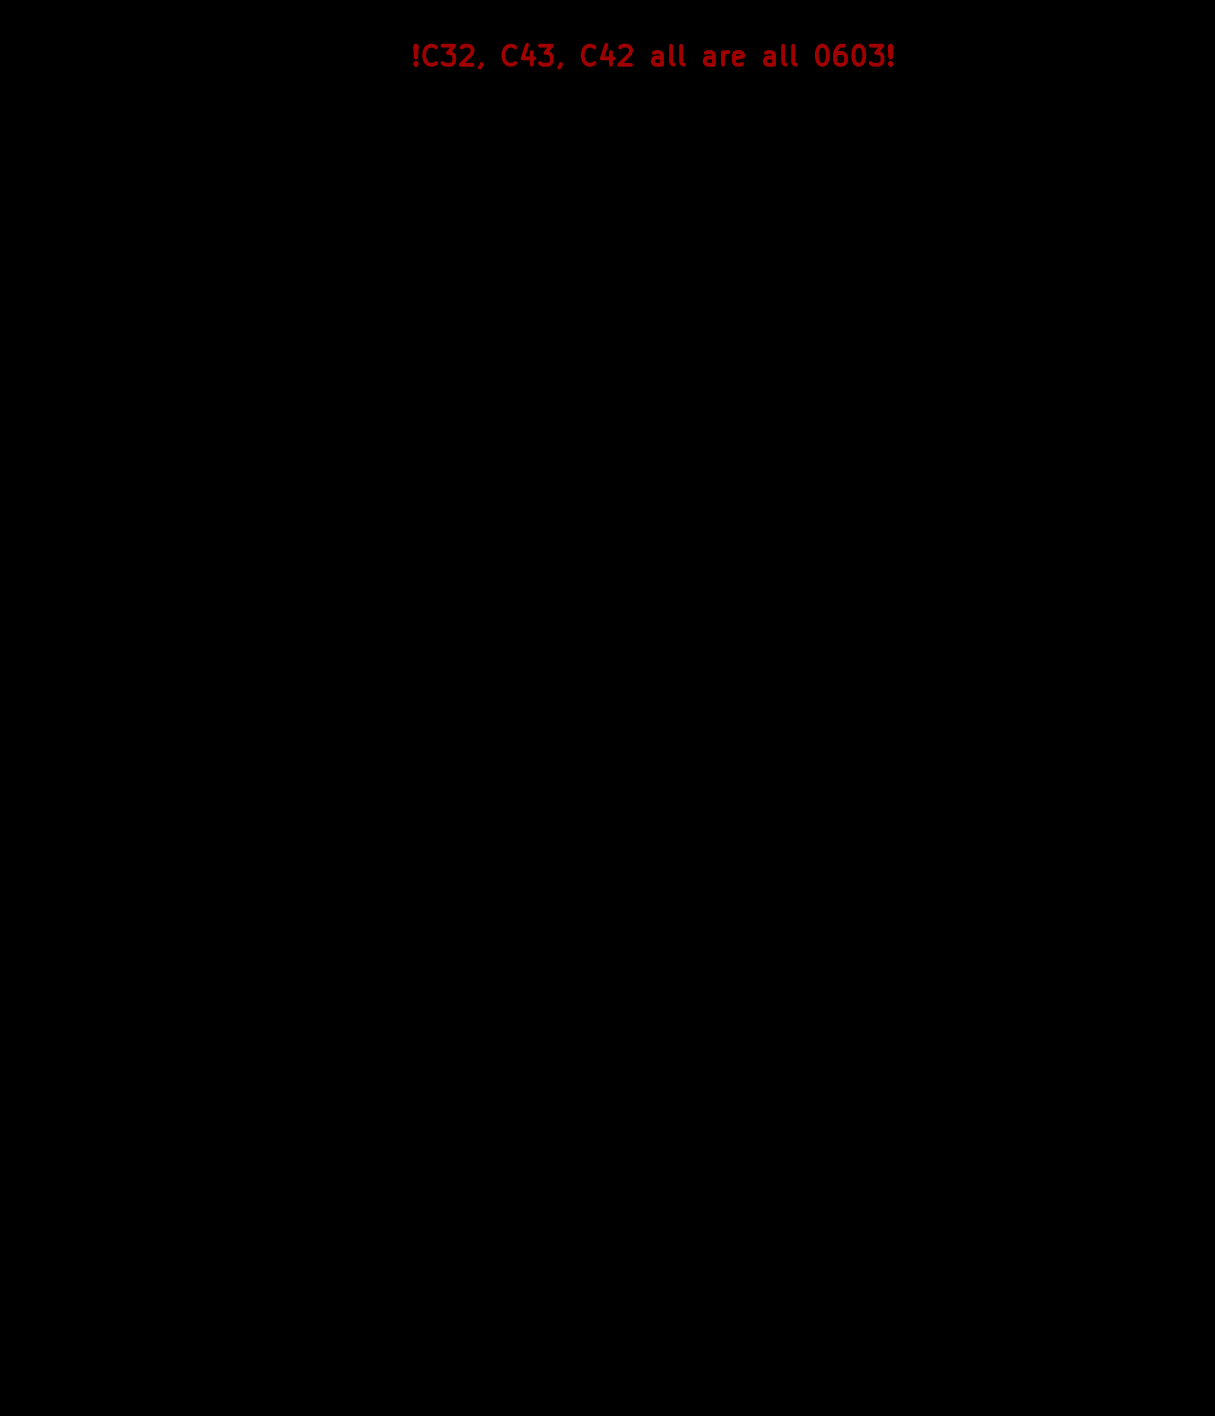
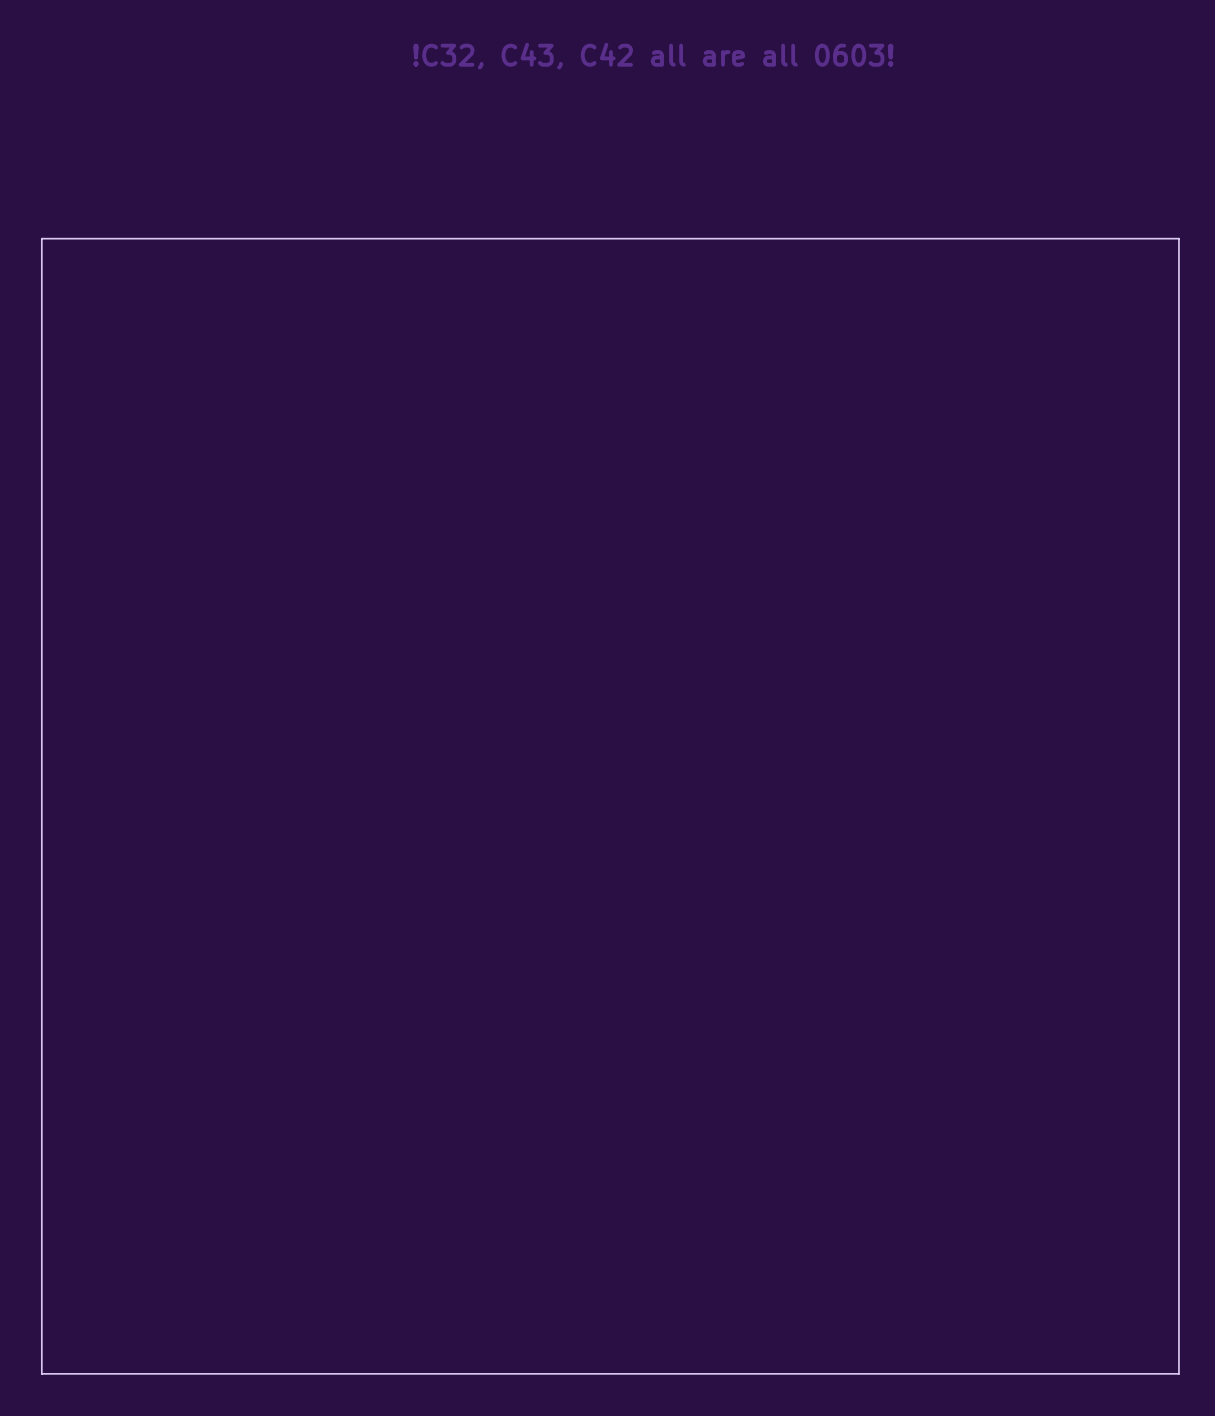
board edge: none -> (41, 238) (1178, 238) (1178, 1373) (41, 1373) (41, 238)

